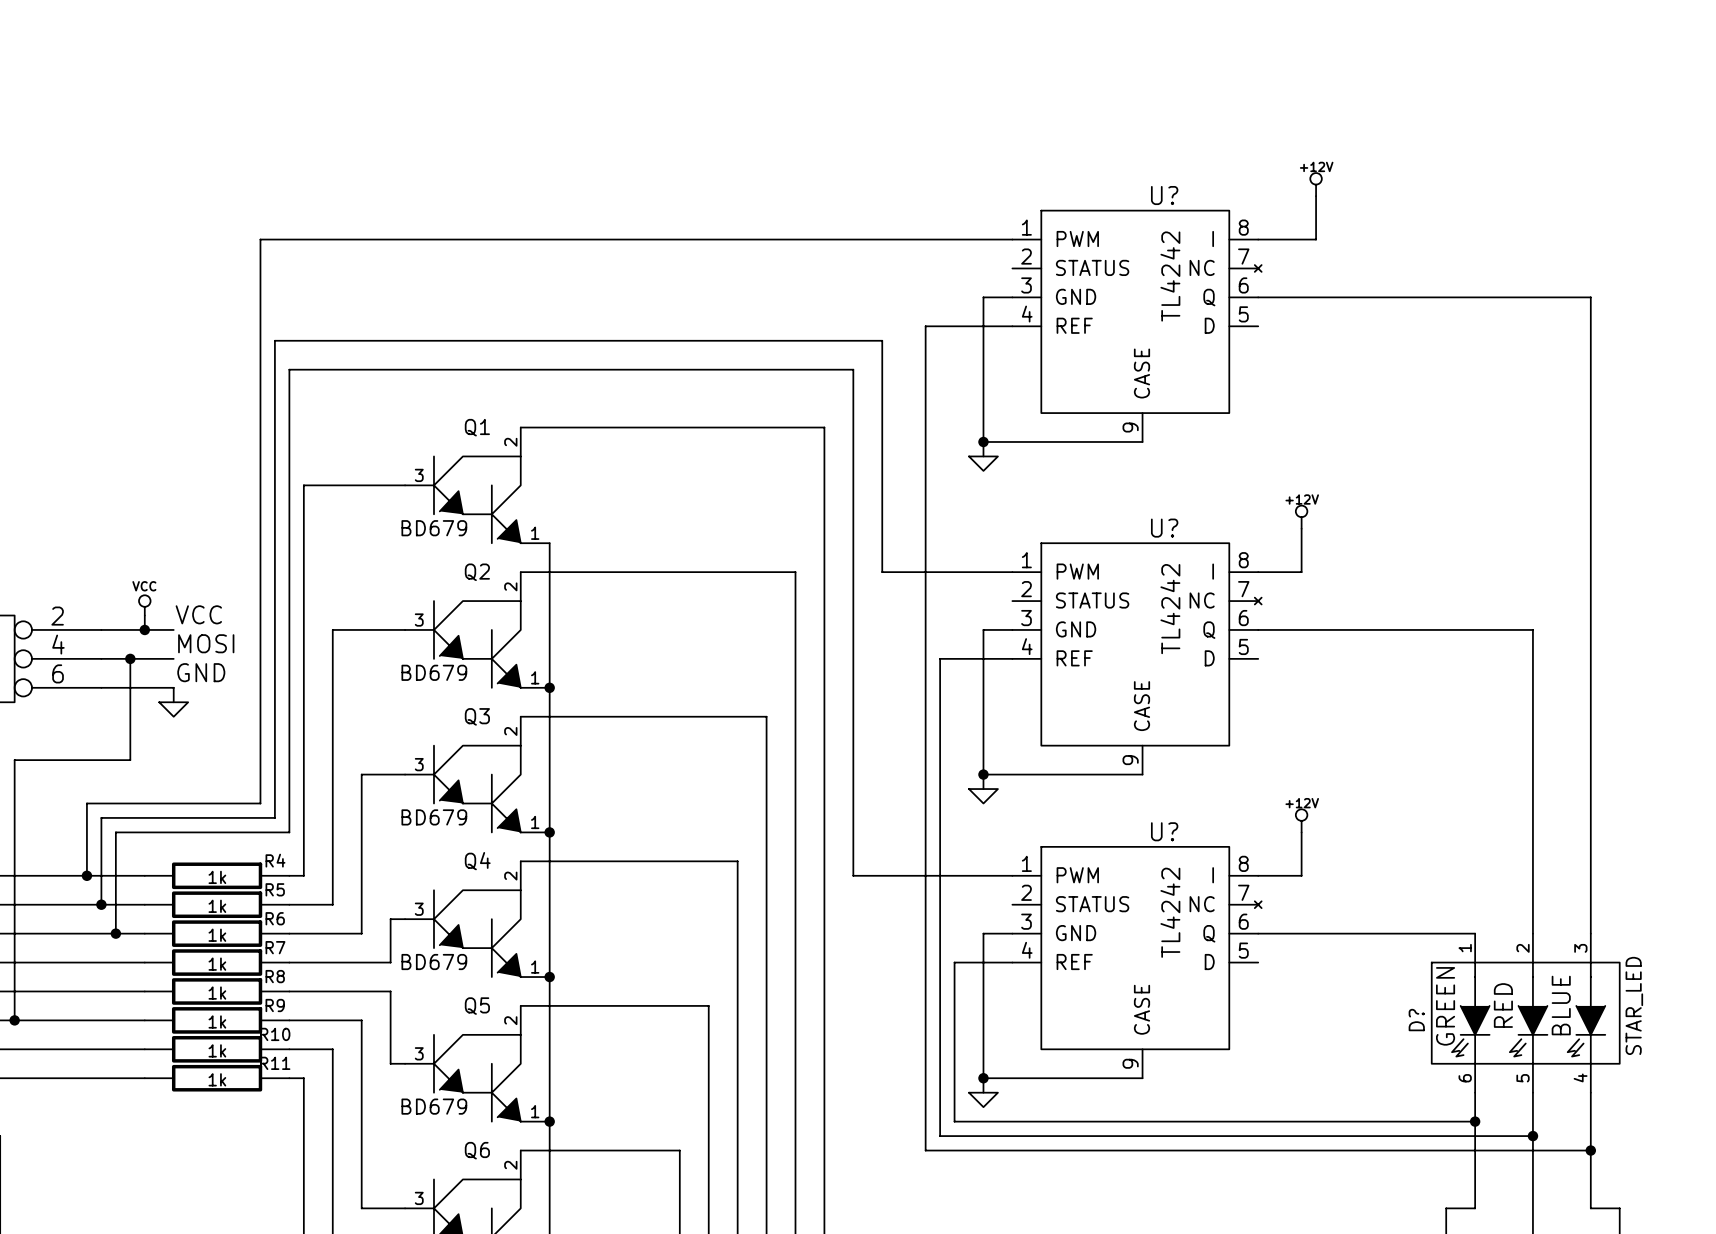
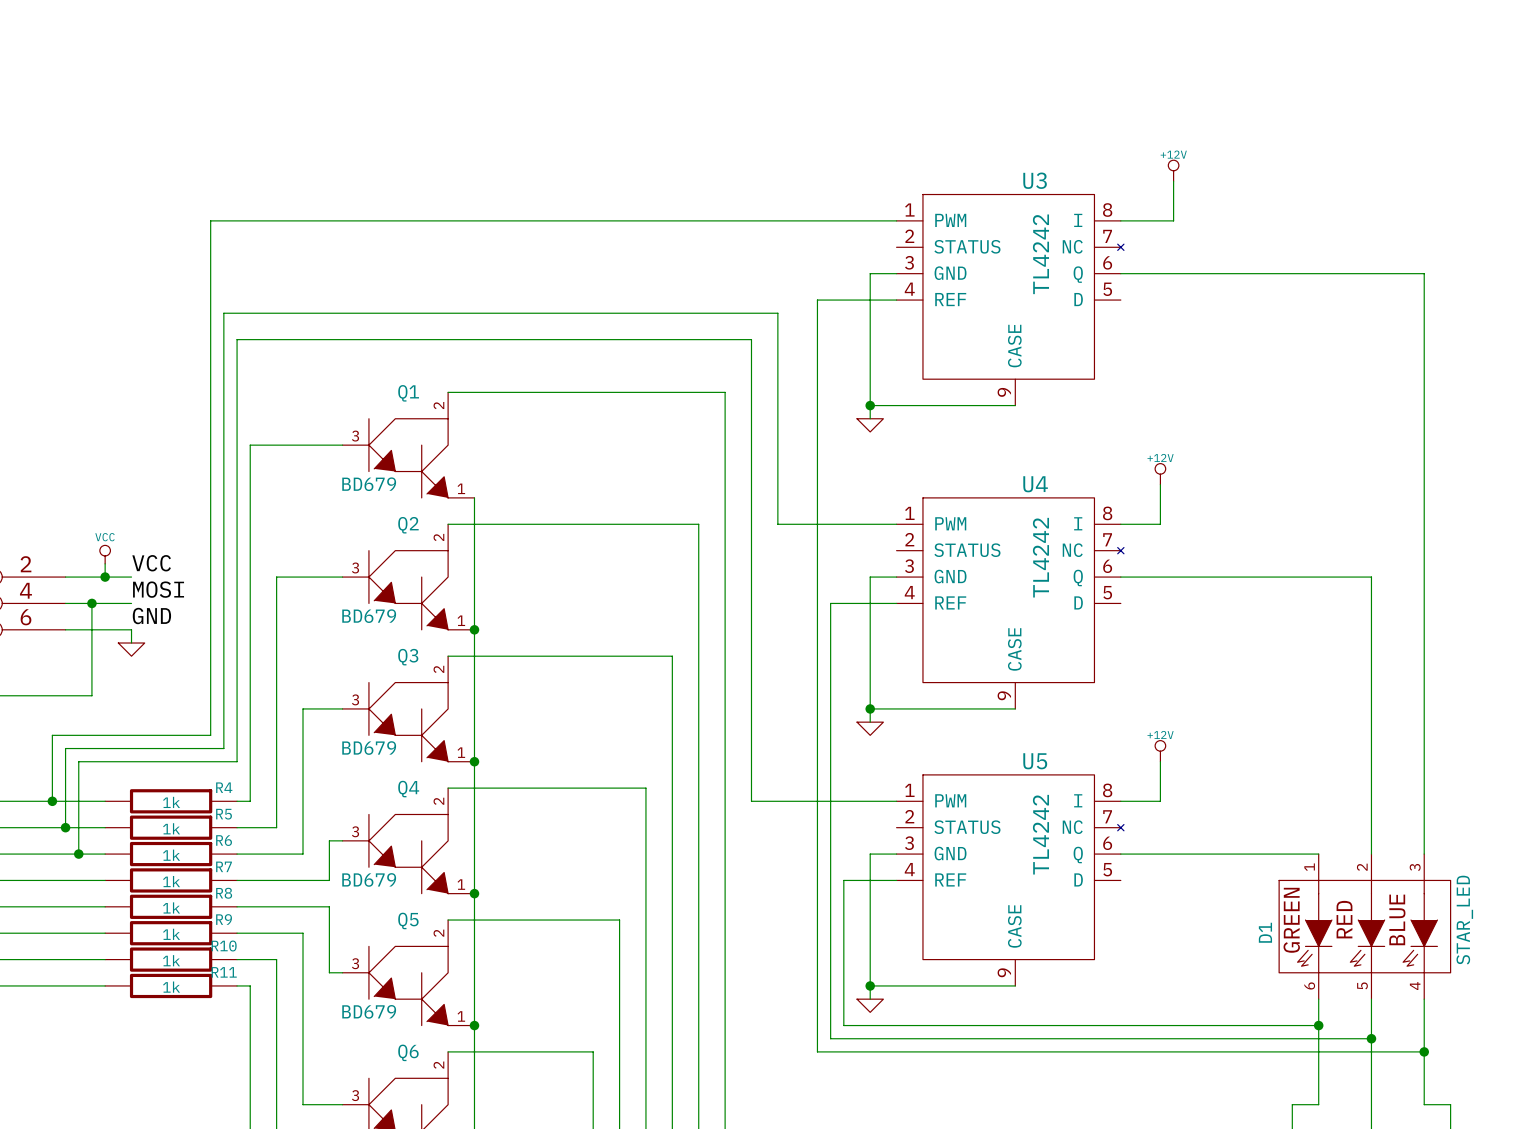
U? name: U? (1164, 195) -> U3 (1035, 180)
U? name: U? (1164, 528) -> U4 (1035, 484)
U? name: U? (1164, 831) -> U5 (1035, 761)
D? name: D? (1416, 1020) -> D1 (1265, 932)

